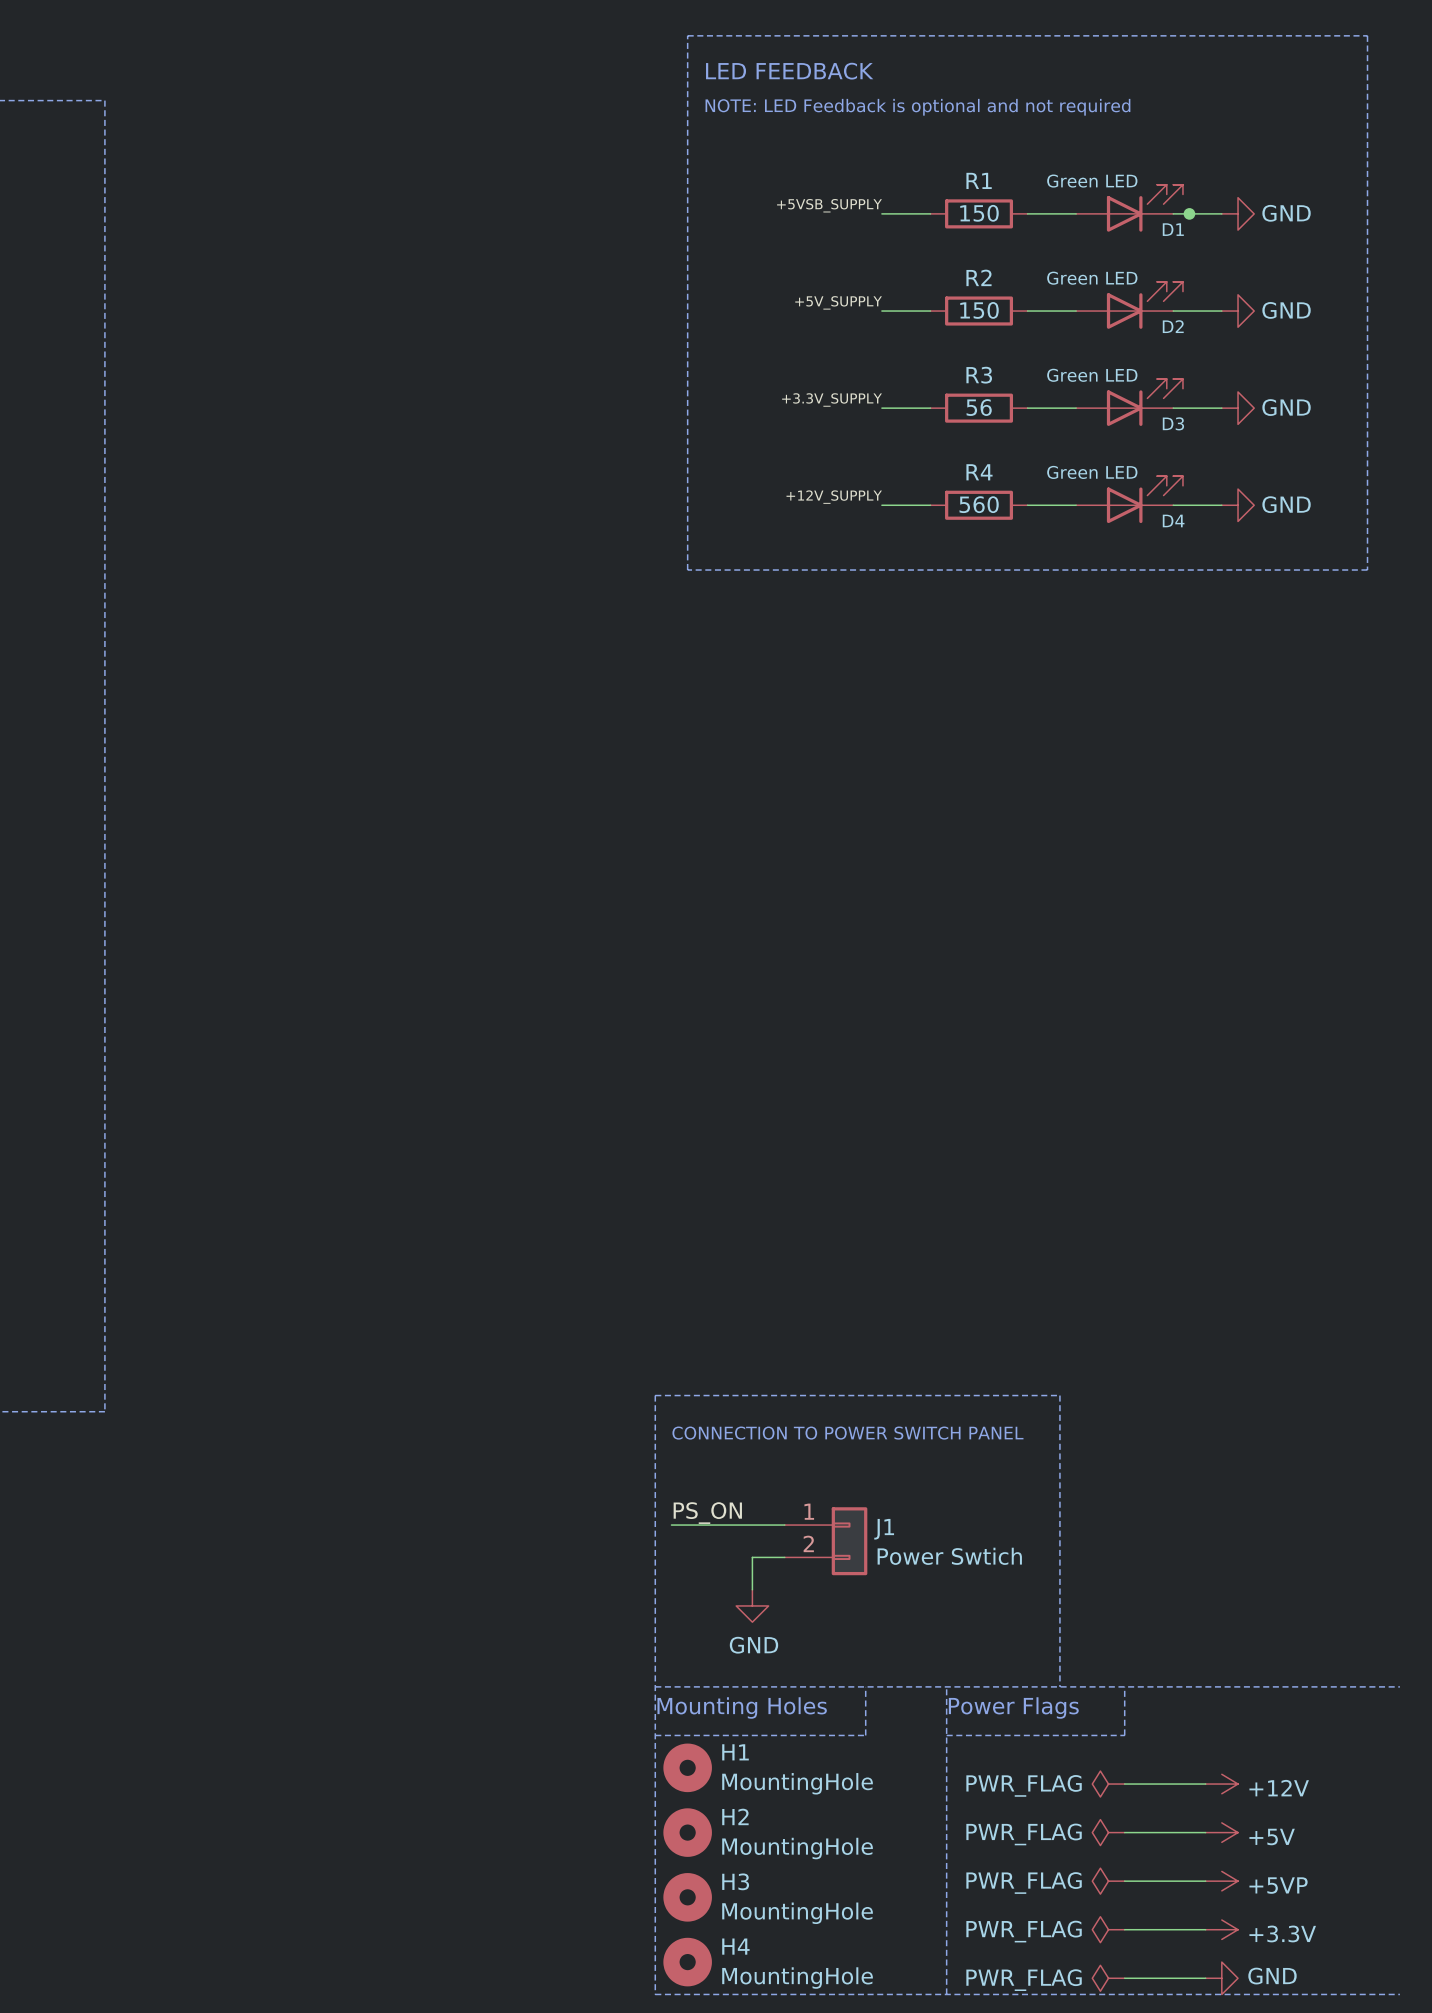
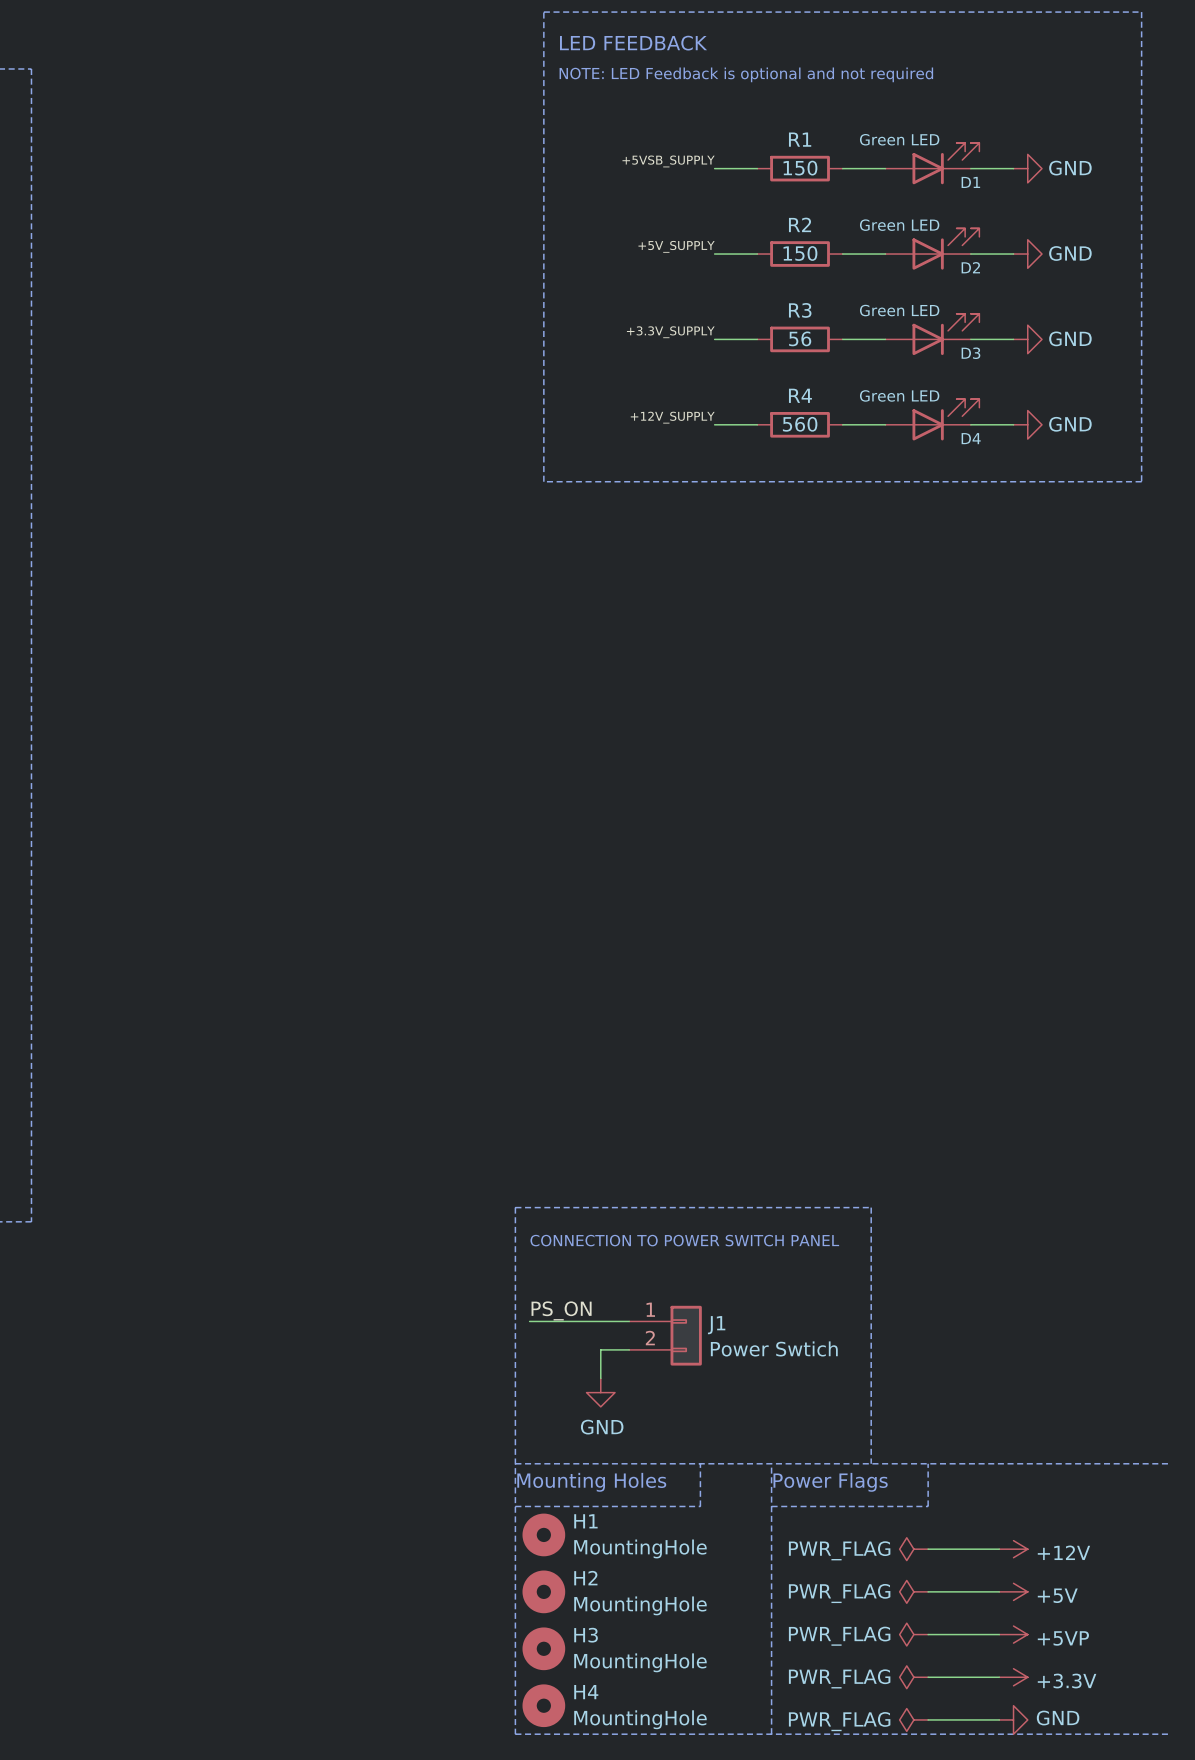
junction: (1189, 213) -> none

